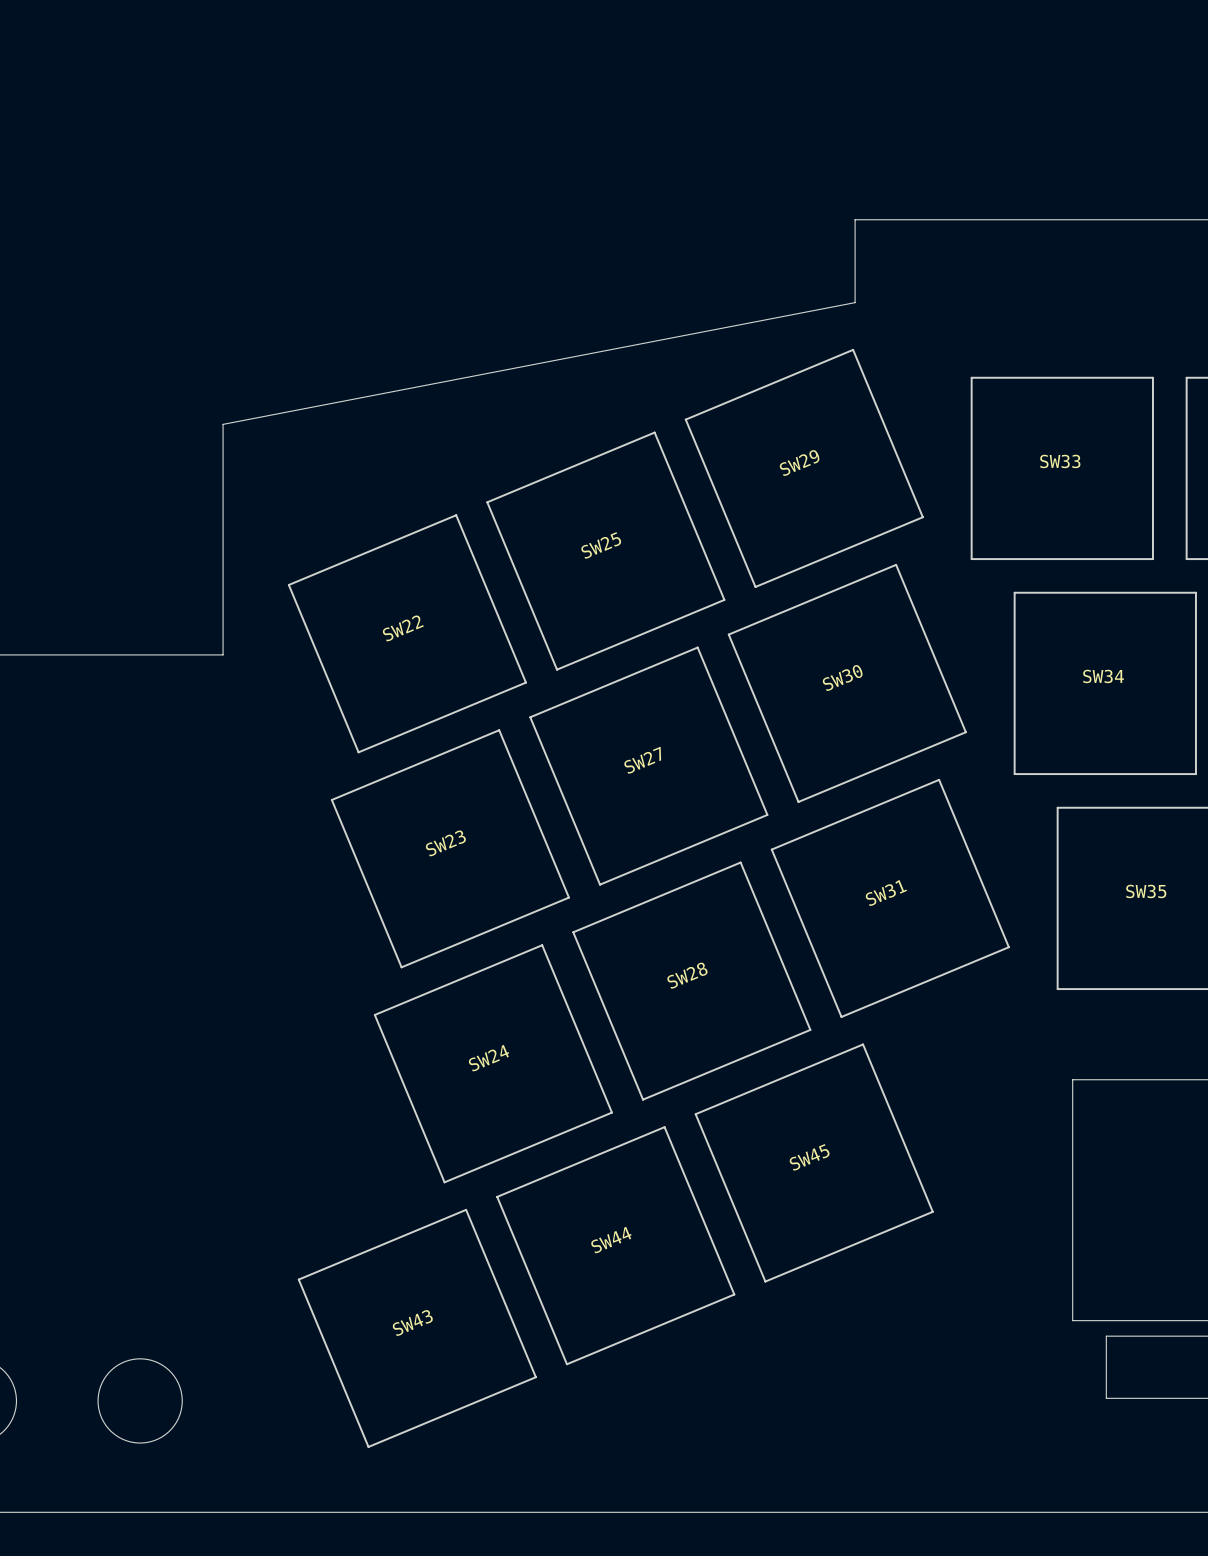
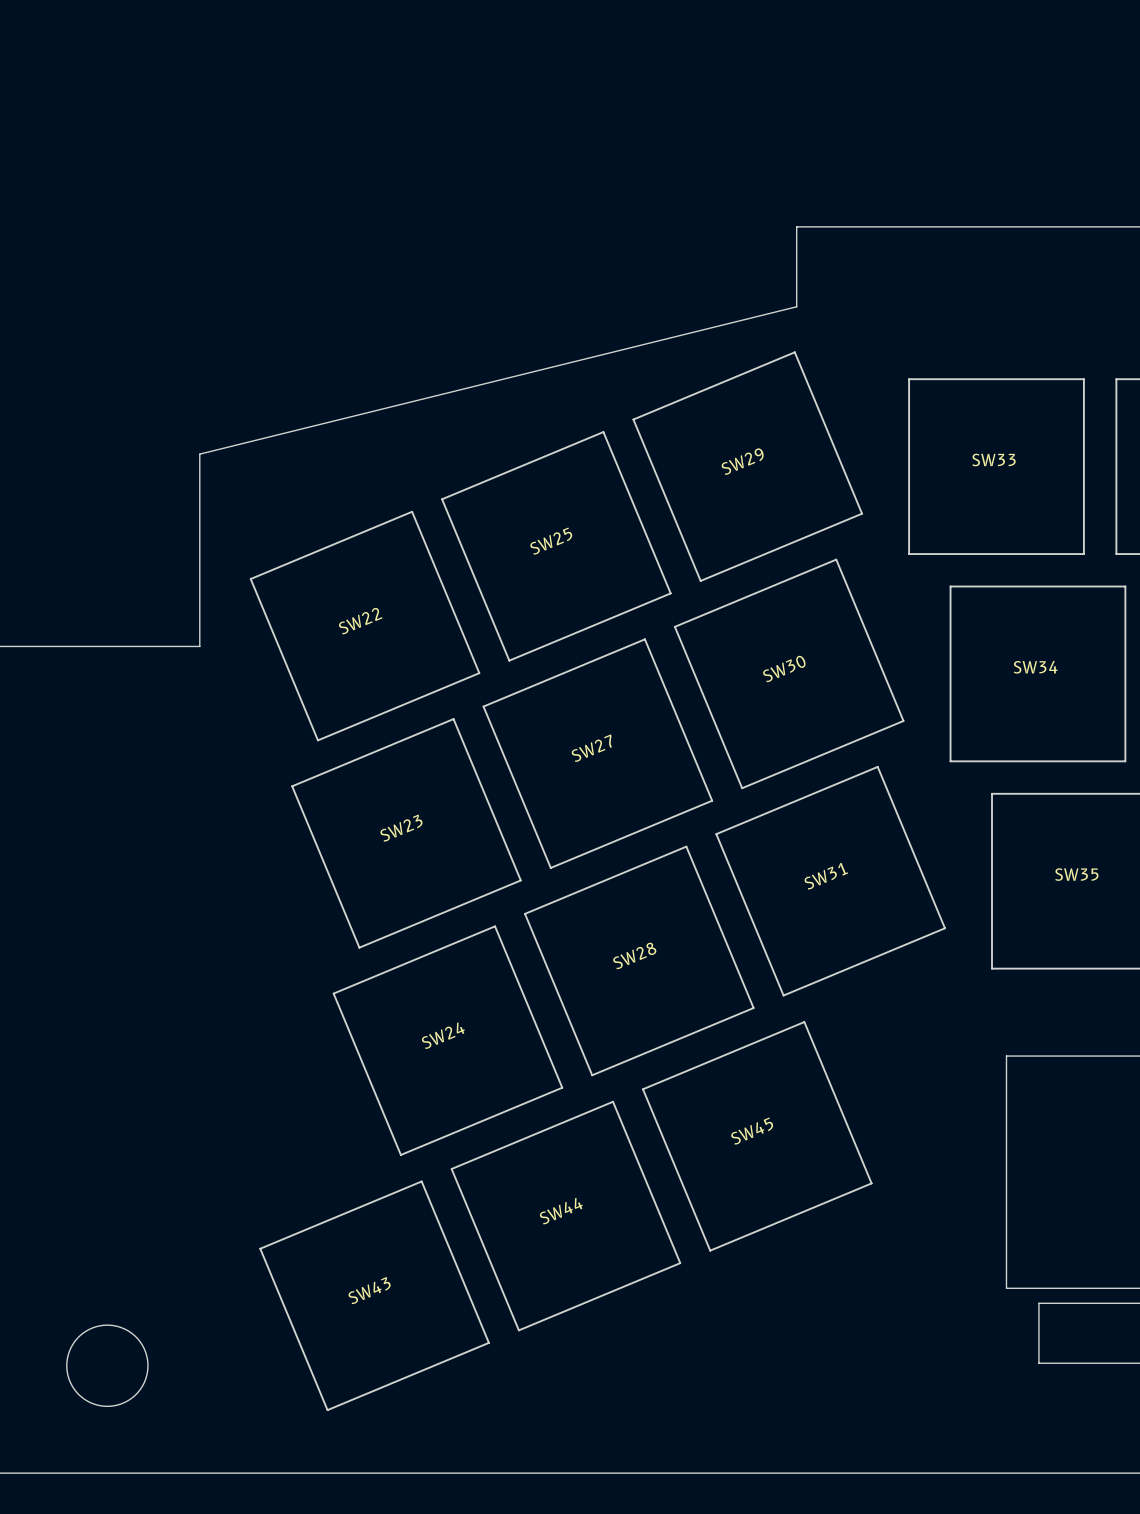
board edge: (855, 302) (223, 424) (223, 654) -> (796, 306) (199, 454) (199, 646) (187, 646)

